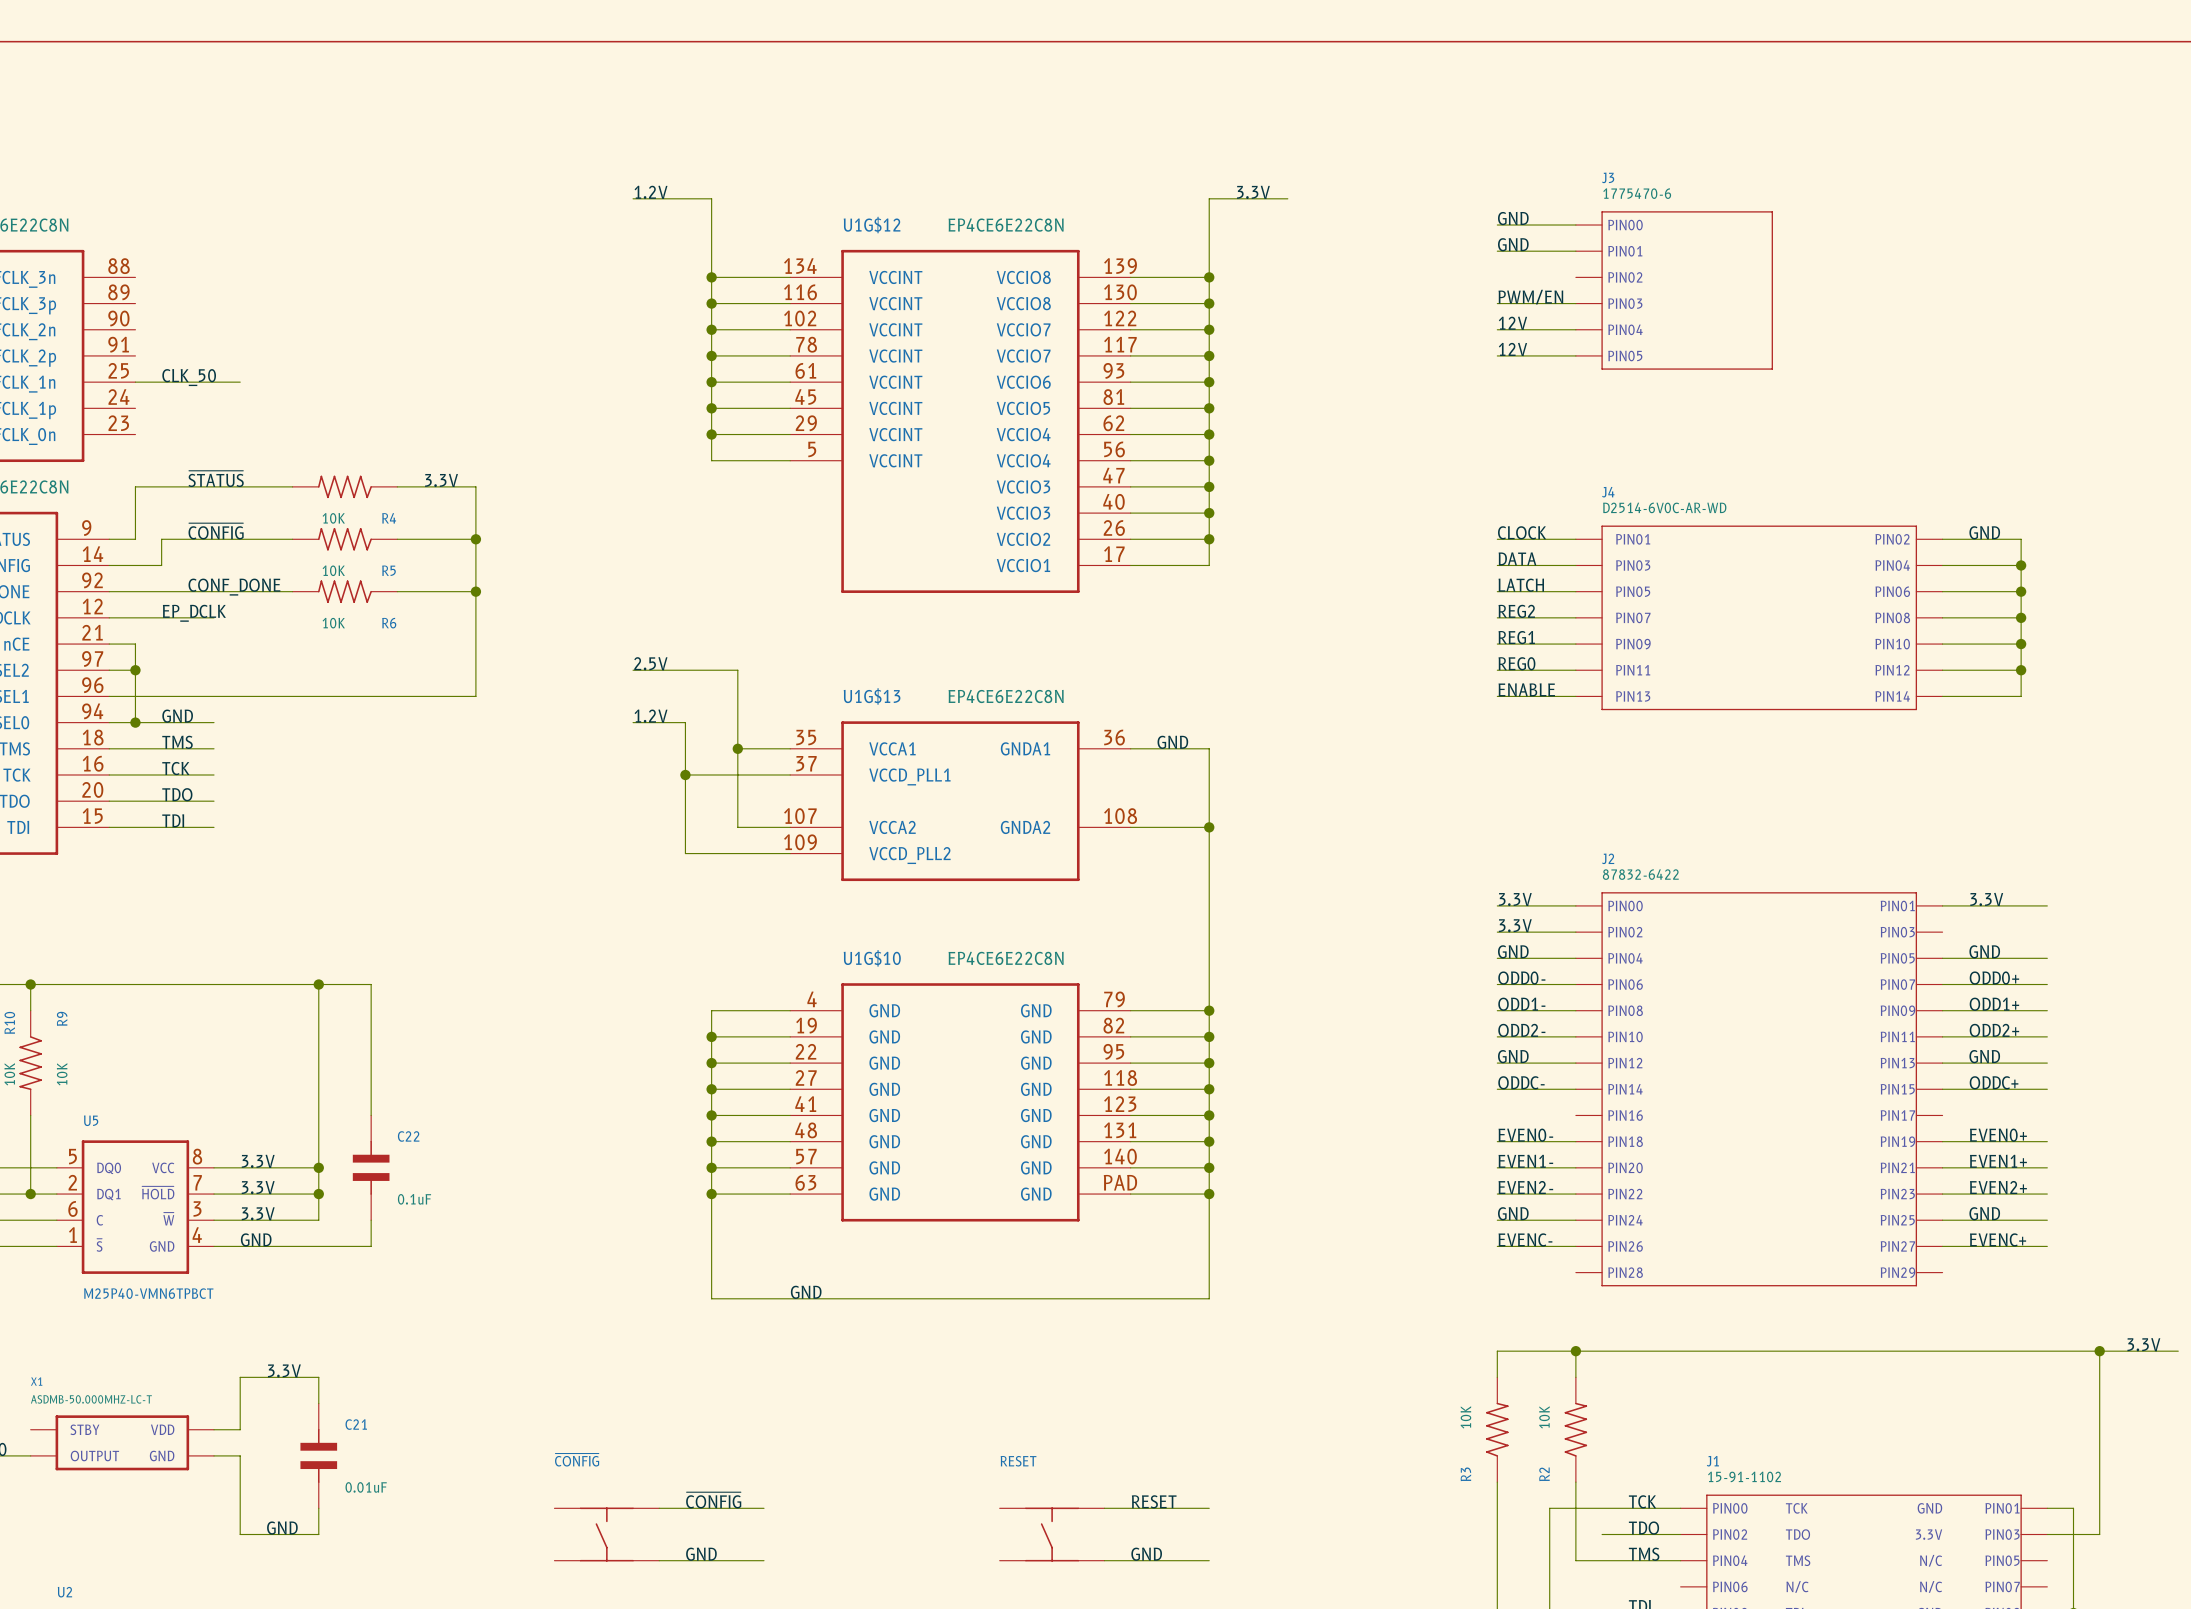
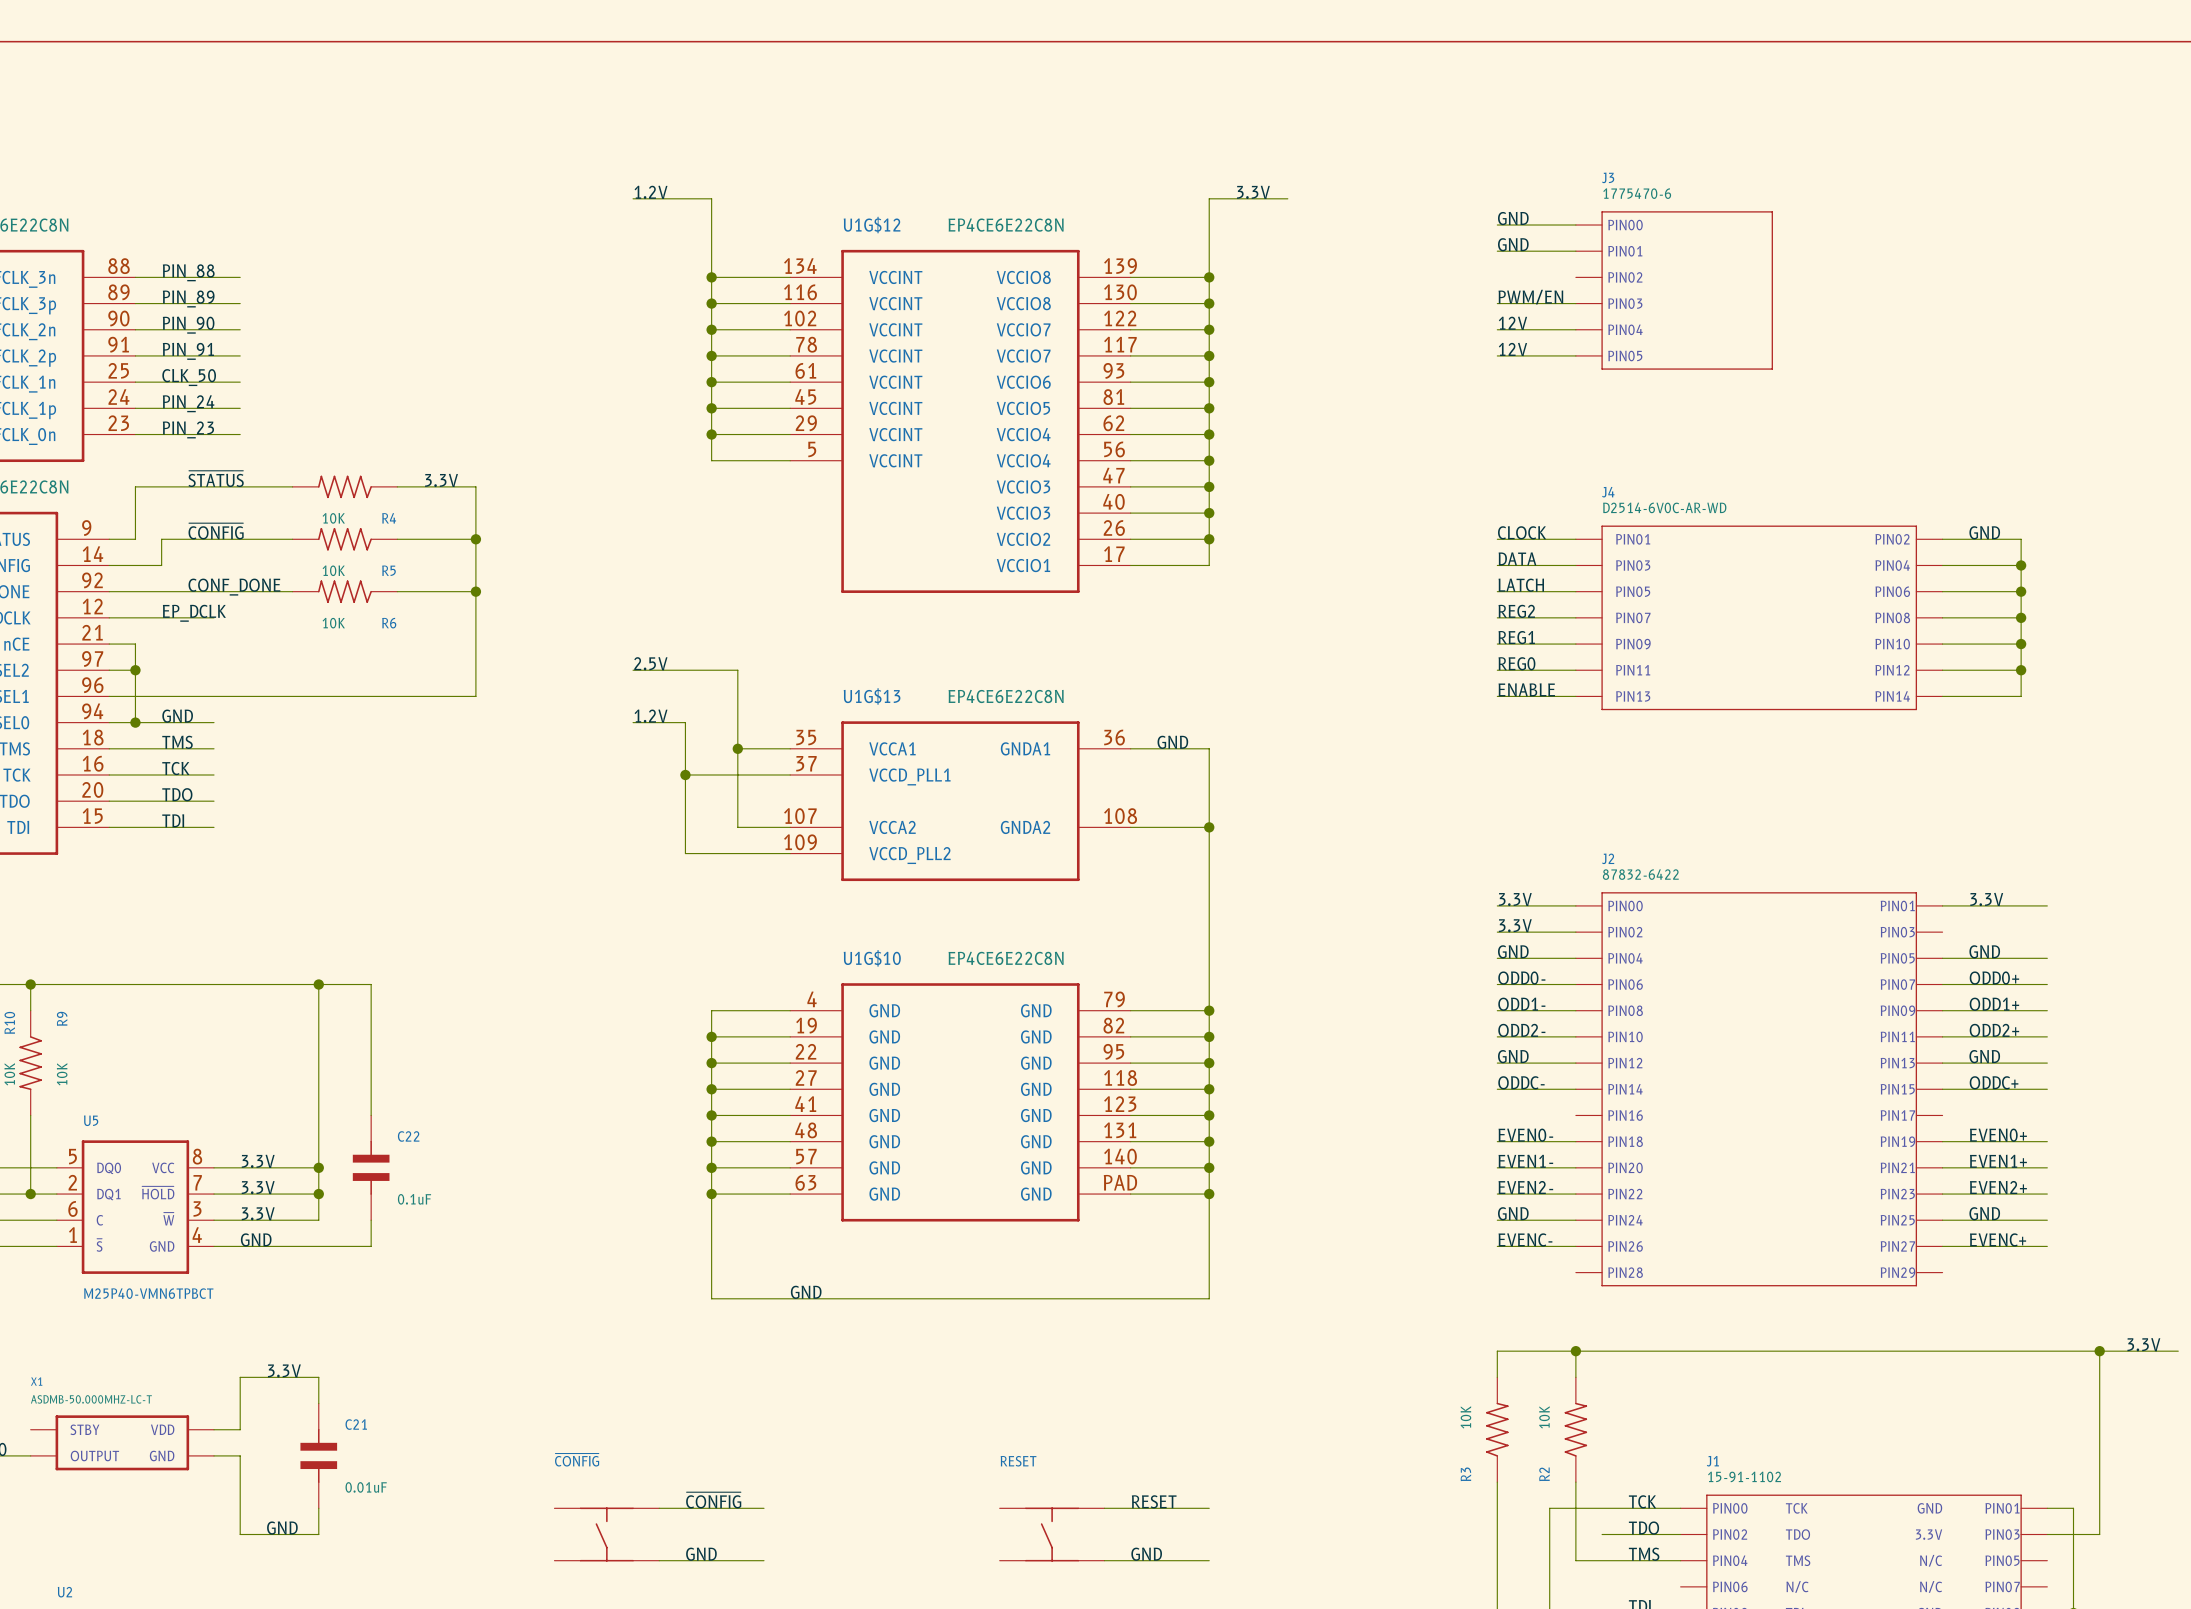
label: none -> PIN_88 (188, 272)
wire: none -> (135, 277) (240, 277)
label: none -> PIN_89 (188, 298)
wire: none -> (135, 303) (240, 303)
label: none -> PIN_90 (188, 325)
wire: none -> (135, 329) (240, 329)
label: none -> PIN_91 (188, 351)
wire: none -> (135, 355) (240, 355)
label: none -> PIN_24 (188, 403)
wire: none -> (135, 408) (240, 408)
label: none -> PIN_23 (188, 429)
wire: none -> (135, 434) (240, 434)

